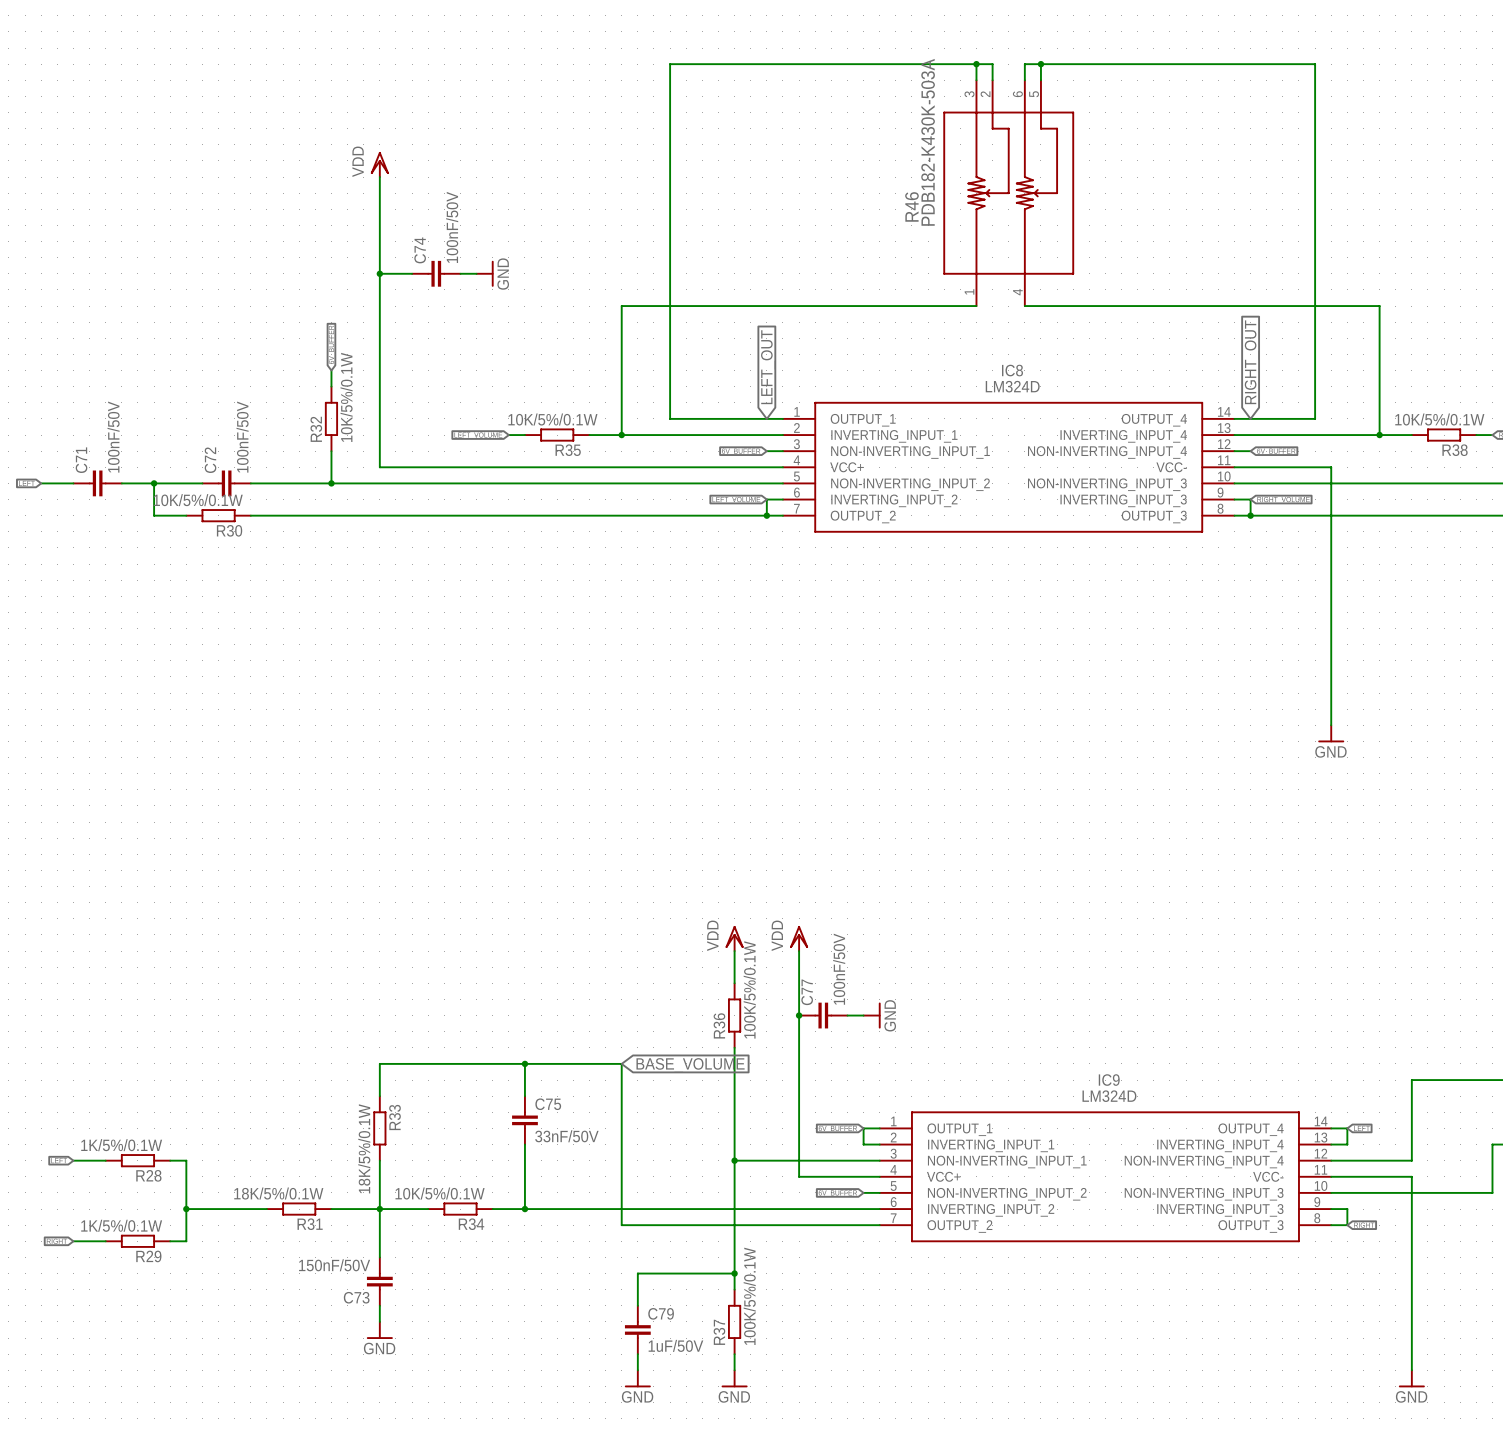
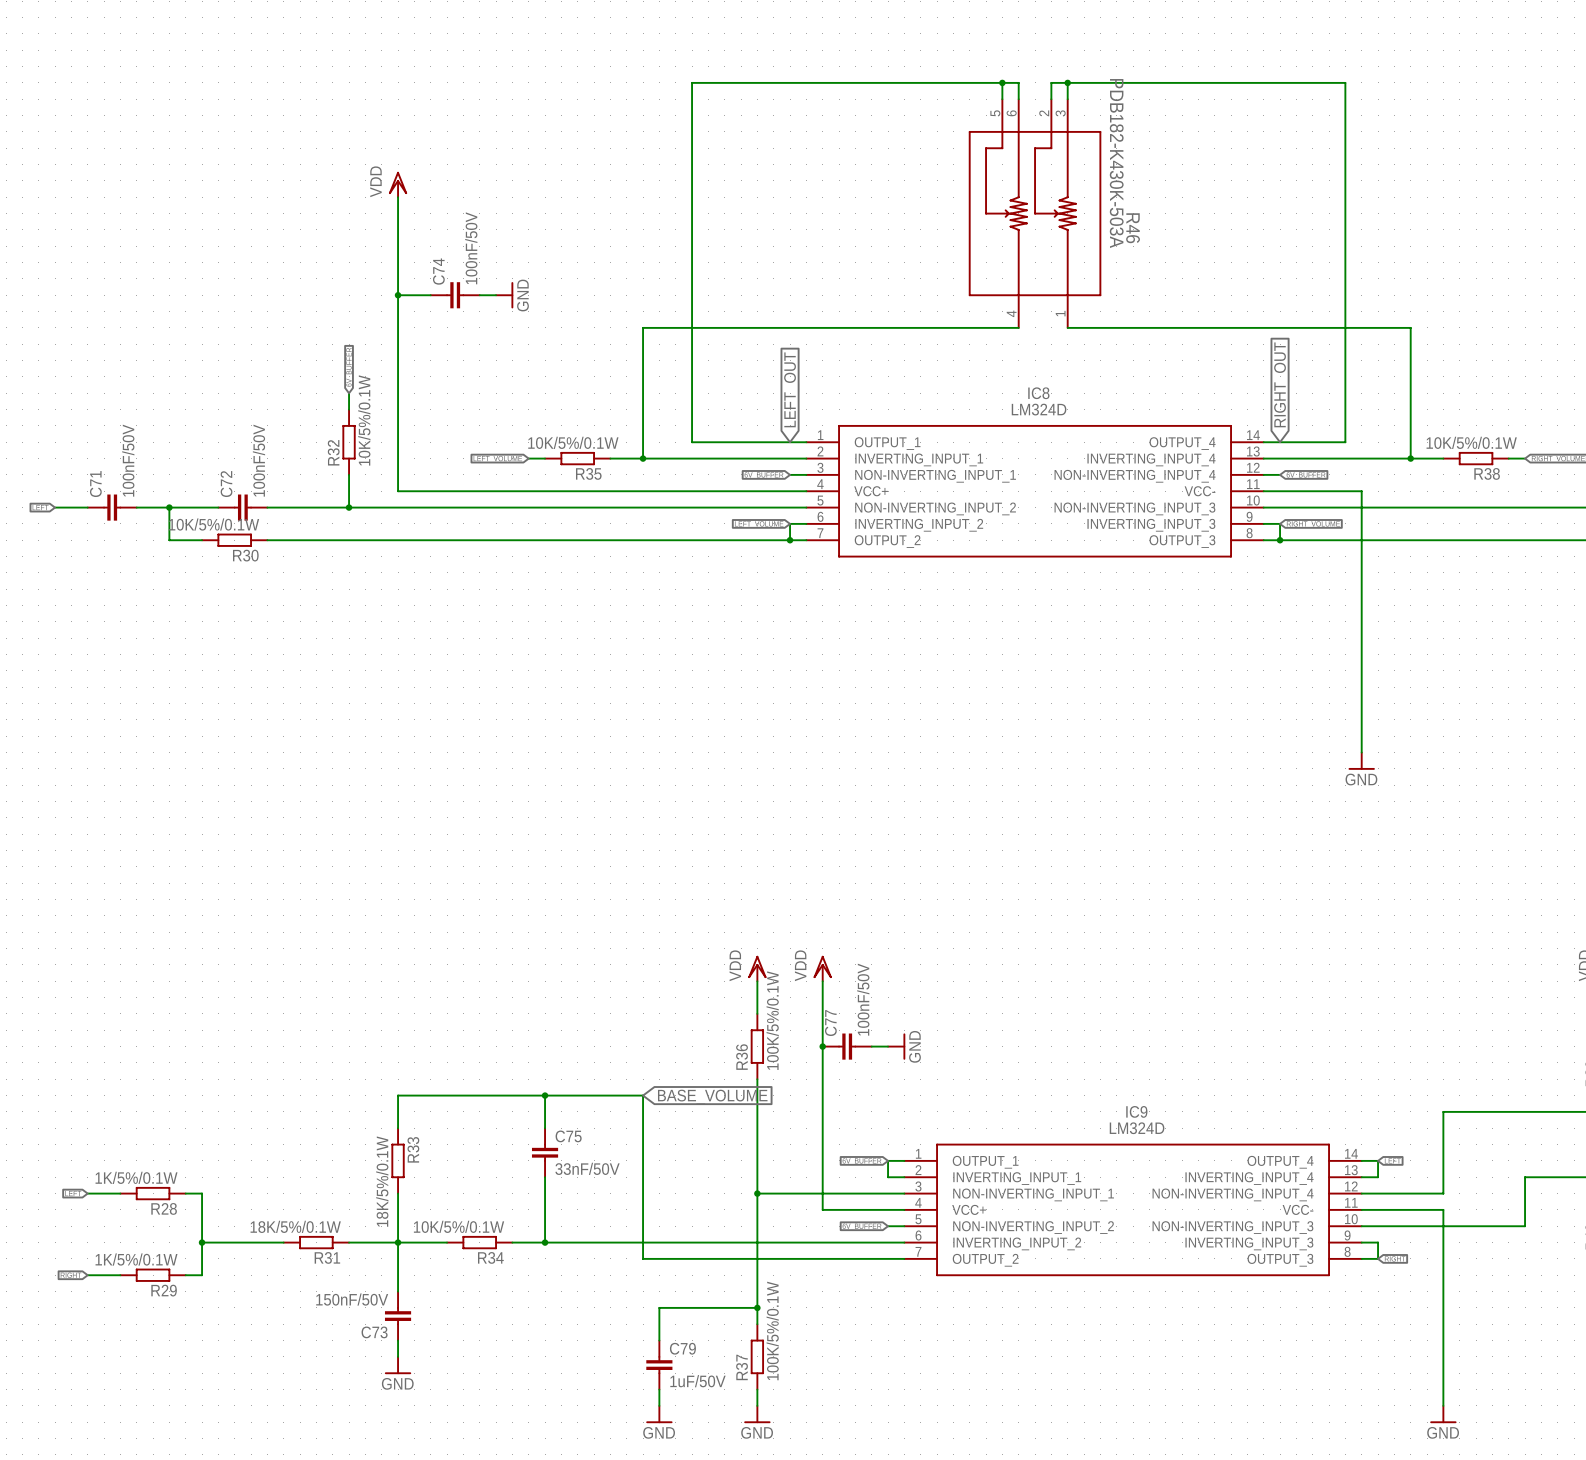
R46 flip: as is (1008, 193) -> left-right (1035, 213)
wire: (1024, 306) (1040, 306) -> (1002, 327) (1018, 327)

